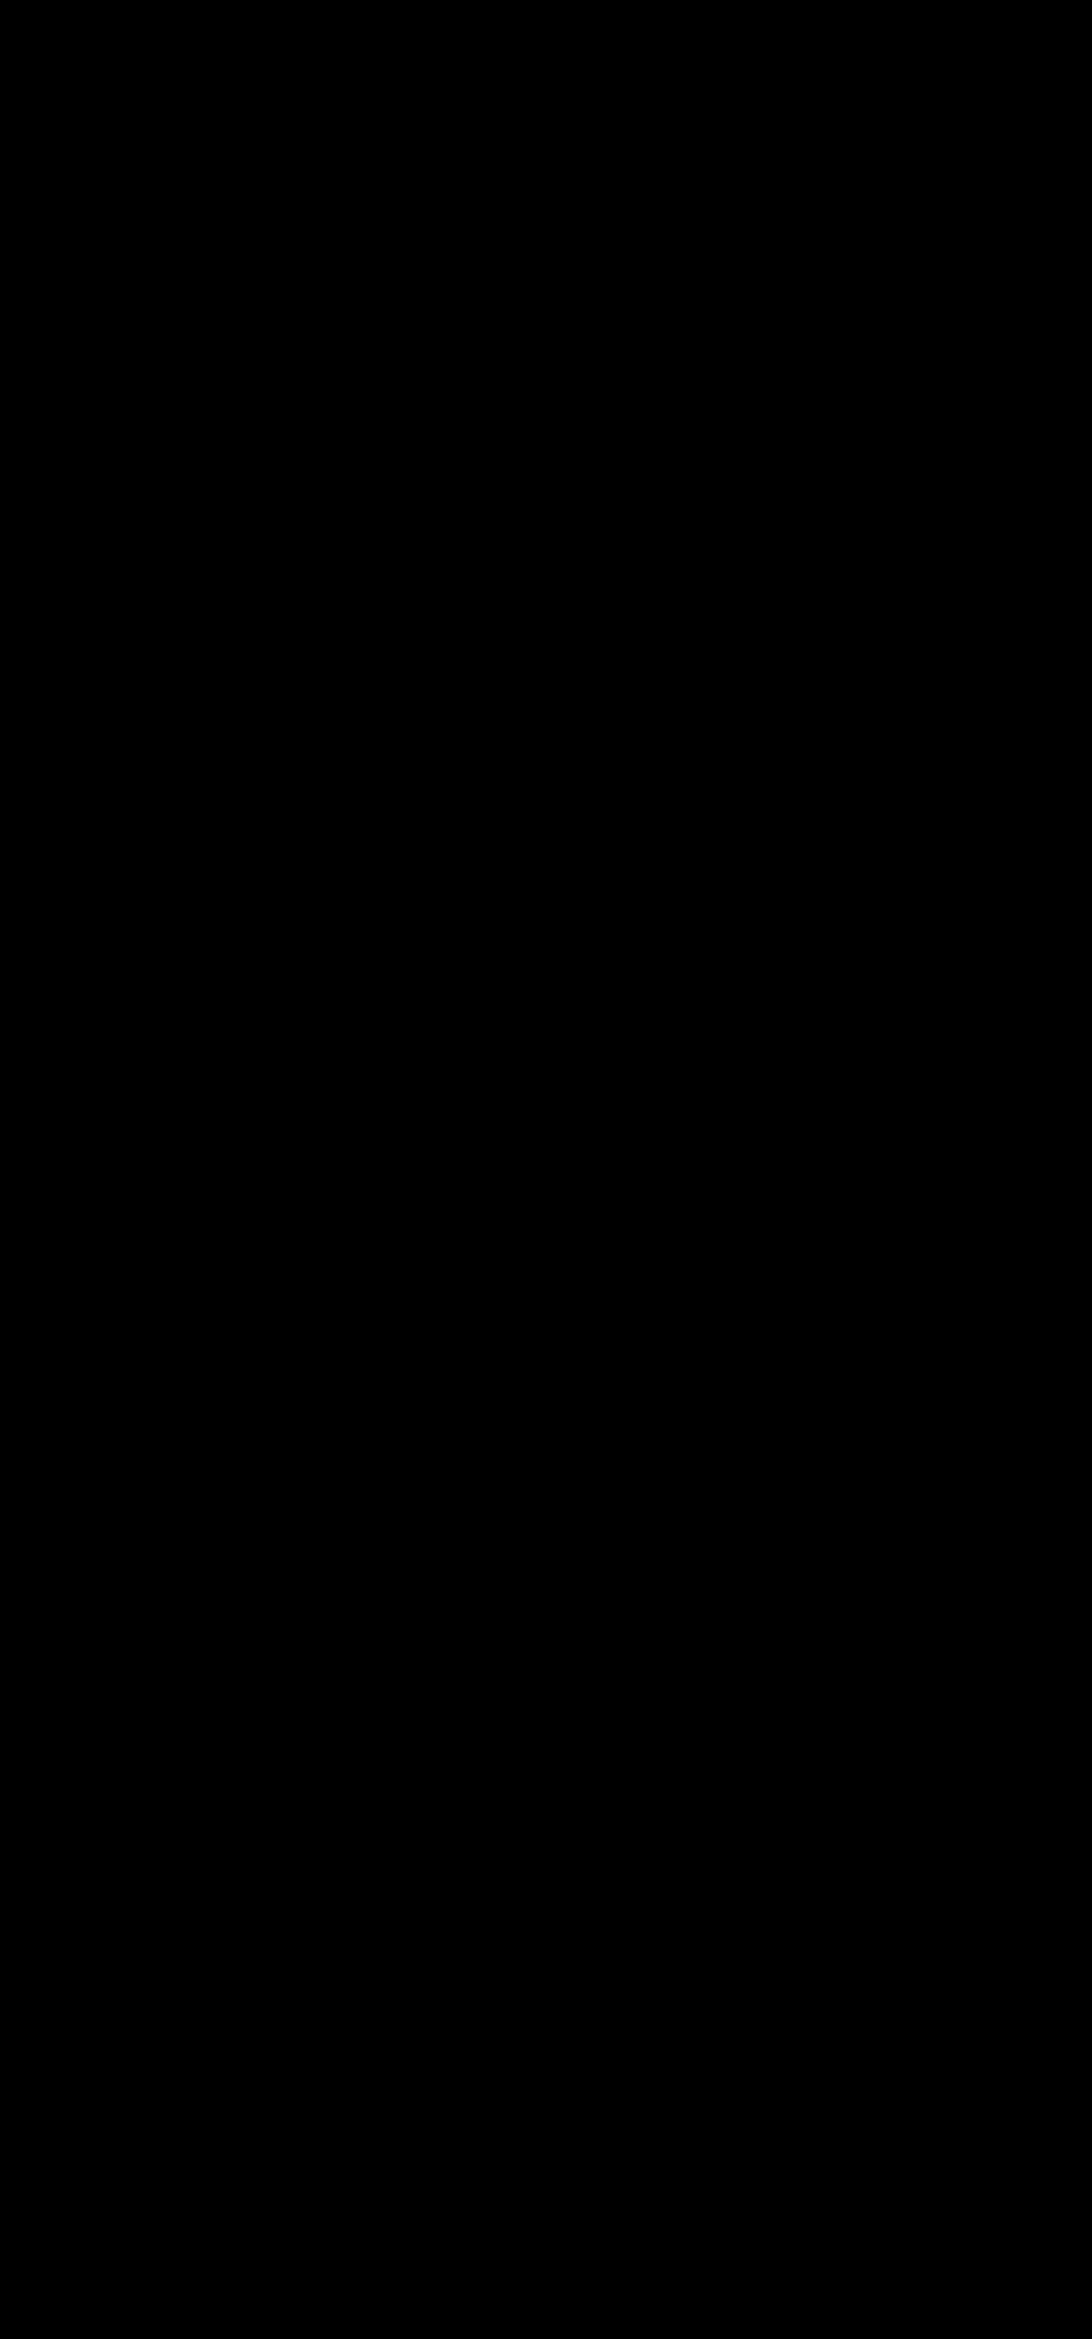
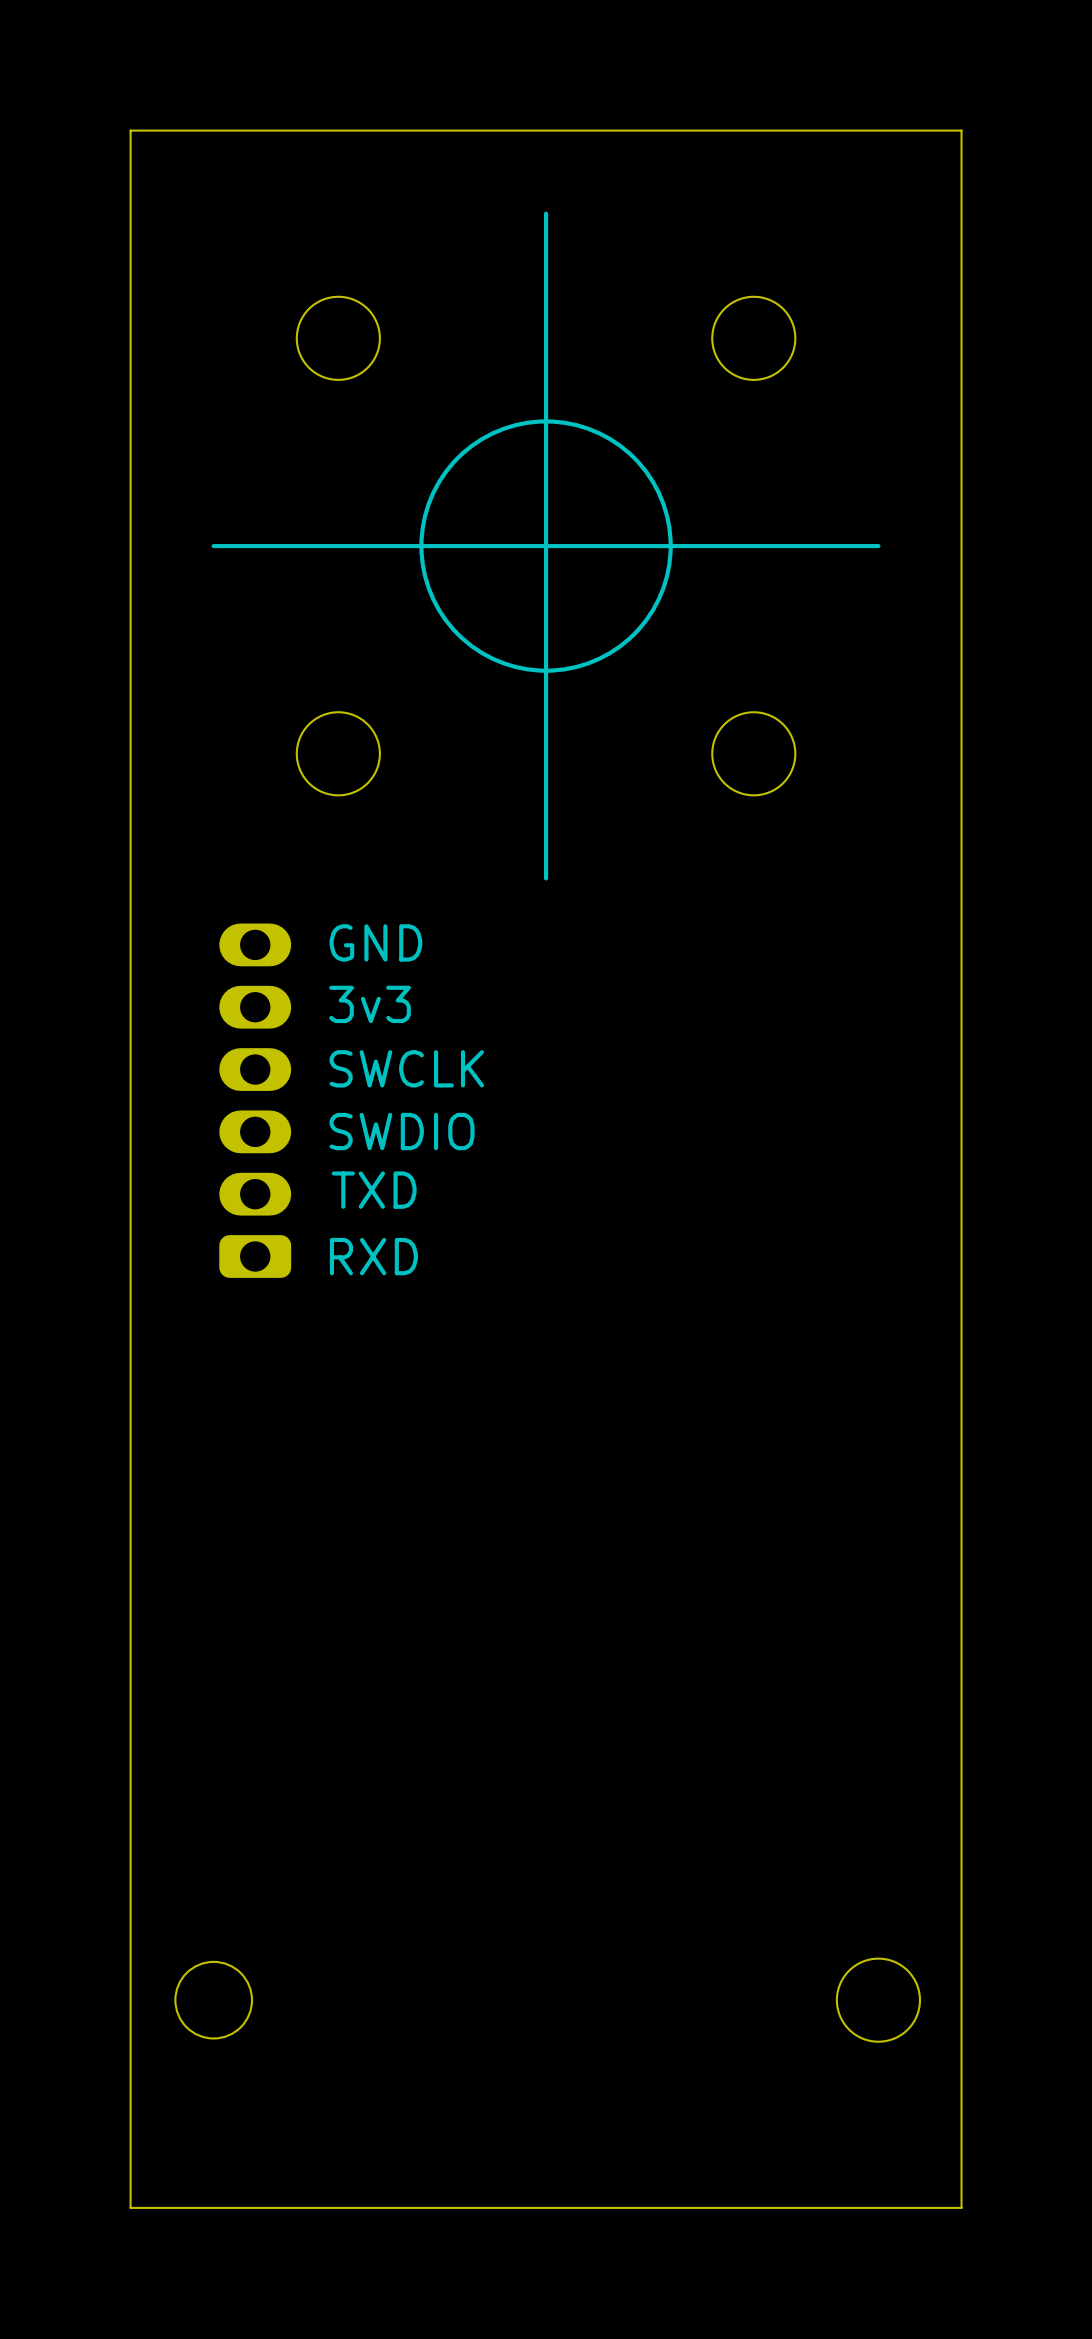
board edge: none -> (961, 130) (130, 130) (130, 2207) (961, 2207) (961, 130)
line: none -> (546, 213) (546, 878)
round board edge: none -> [295, 295, 381, 381]
round board edge: none -> [711, 295, 797, 381]
drawing: none -> [419, 419, 673, 673]
line: none -> (878, 546) (213, 546)
round board edge: none -> [295, 711, 381, 797]
round board edge: none -> [711, 711, 797, 797]
text: none -> GND (375, 942)
text: none -> 3v3 (370, 1004)
text: none -> SWCLK (406, 1068)
part: none -> (255, 1100)
text: none -> SWDIO (402, 1131)
text: none -> TXD (374, 1190)
text: none -> RXD (373, 1256)
round board edge: none -> [835, 1957, 922, 2043]
round board edge: none -> [174, 1960, 254, 2040]

